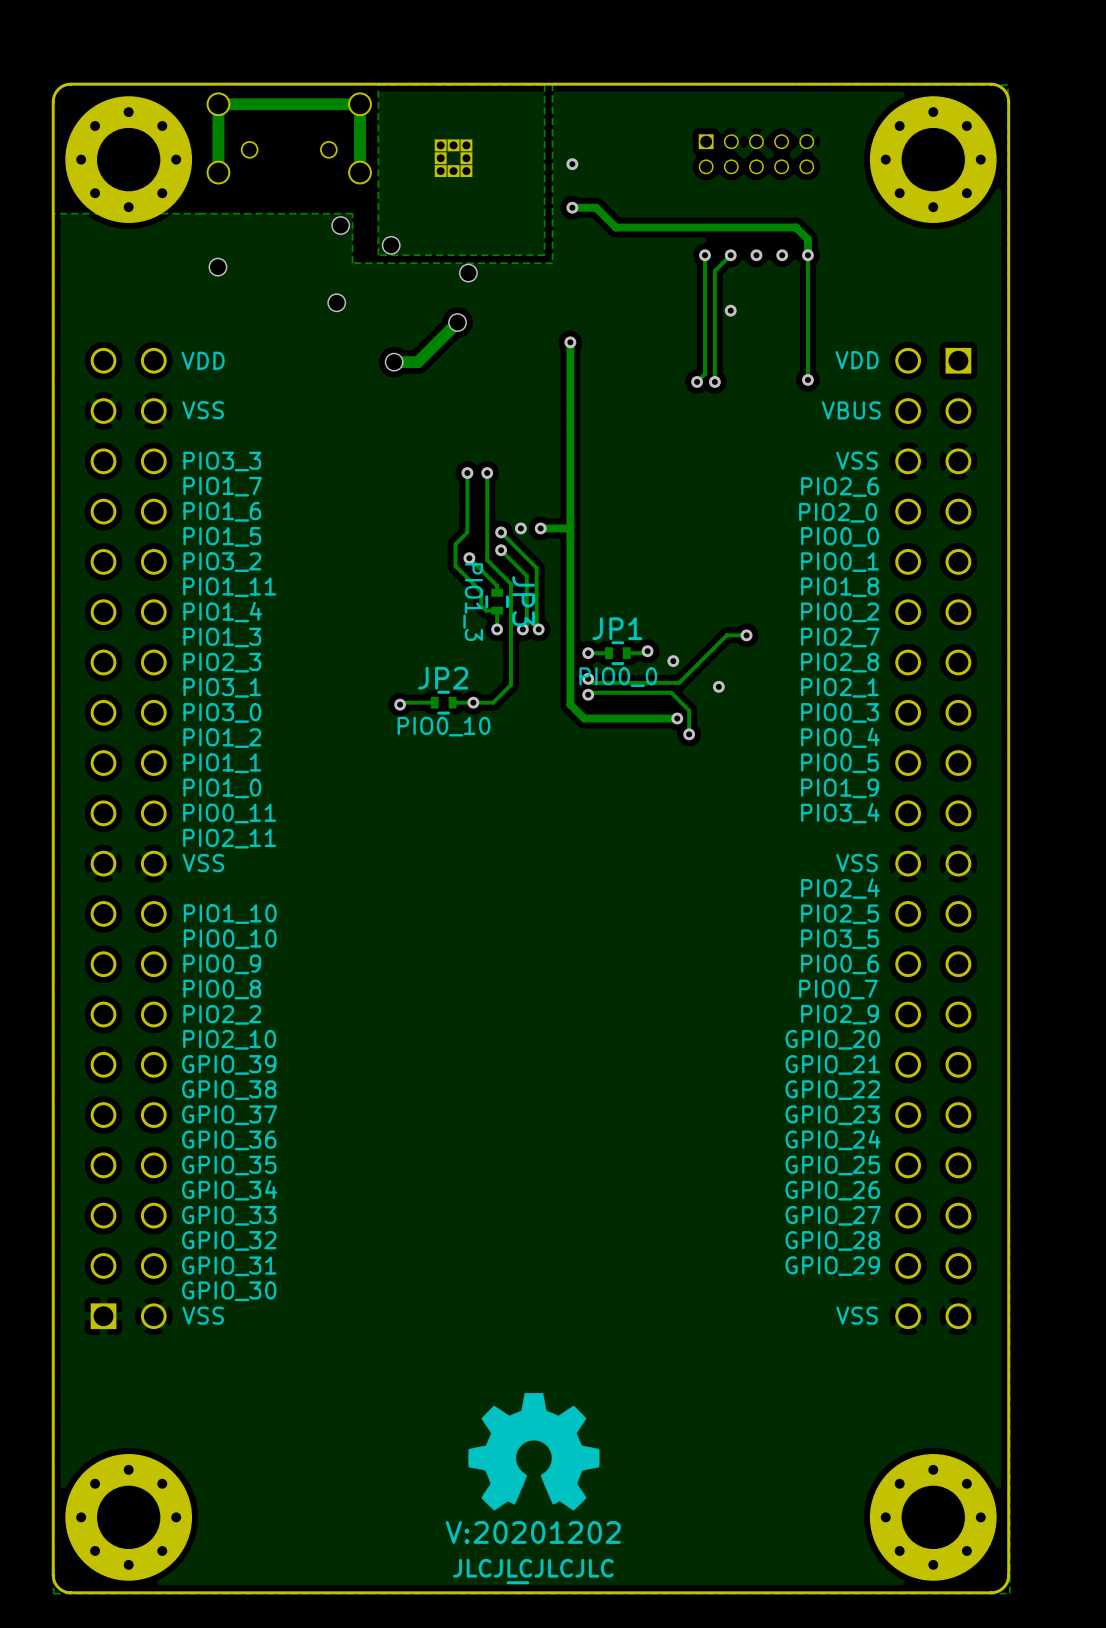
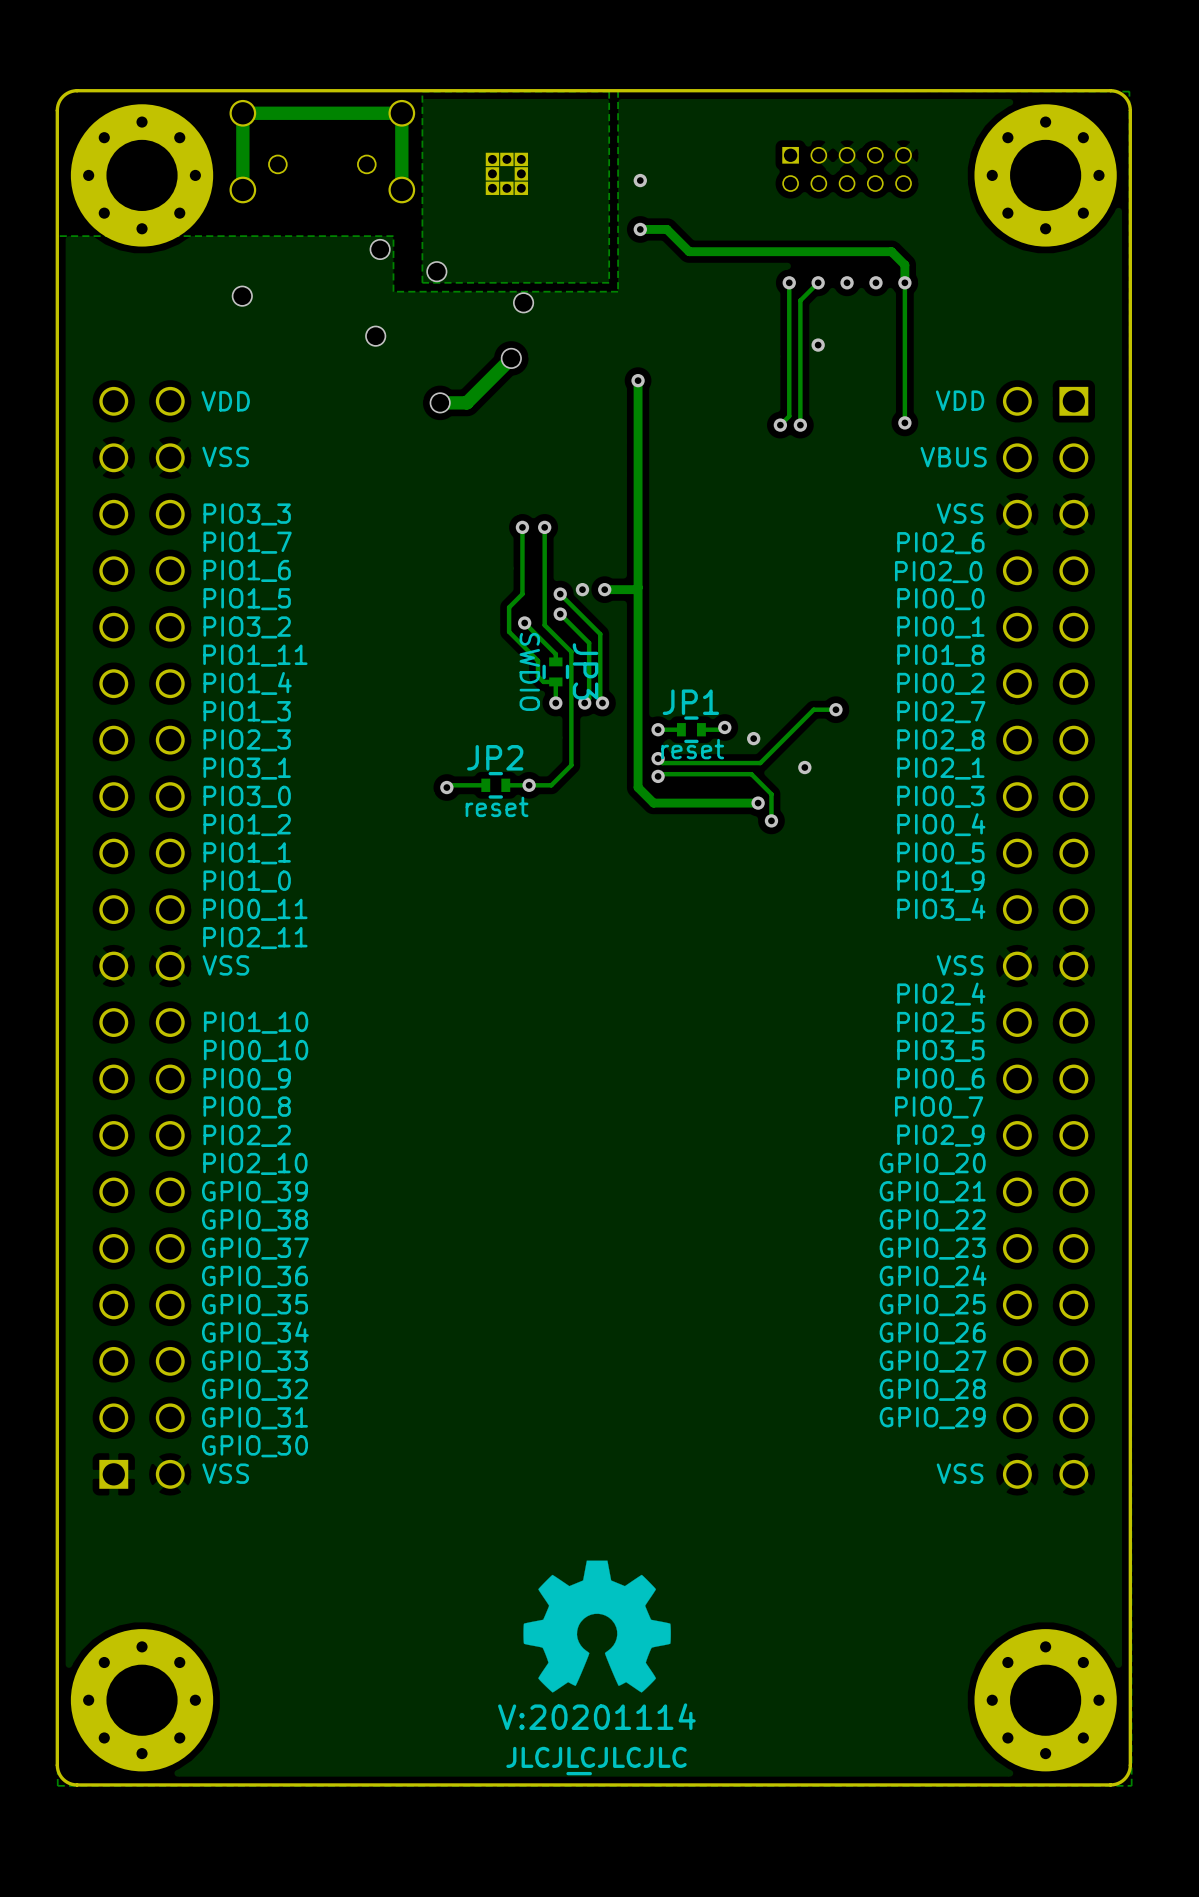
JP3 value: PIO1_3 (473, 602) -> SWDIO (529, 671)
JP1 value: PIO0_0 (618, 677) -> reset (692, 749)
JP2 value: PIO0_10 (444, 726) -> reset (497, 806)
drawing shape: [445, 1521, 621, 1544] -> [498, 1703, 696, 1730]

